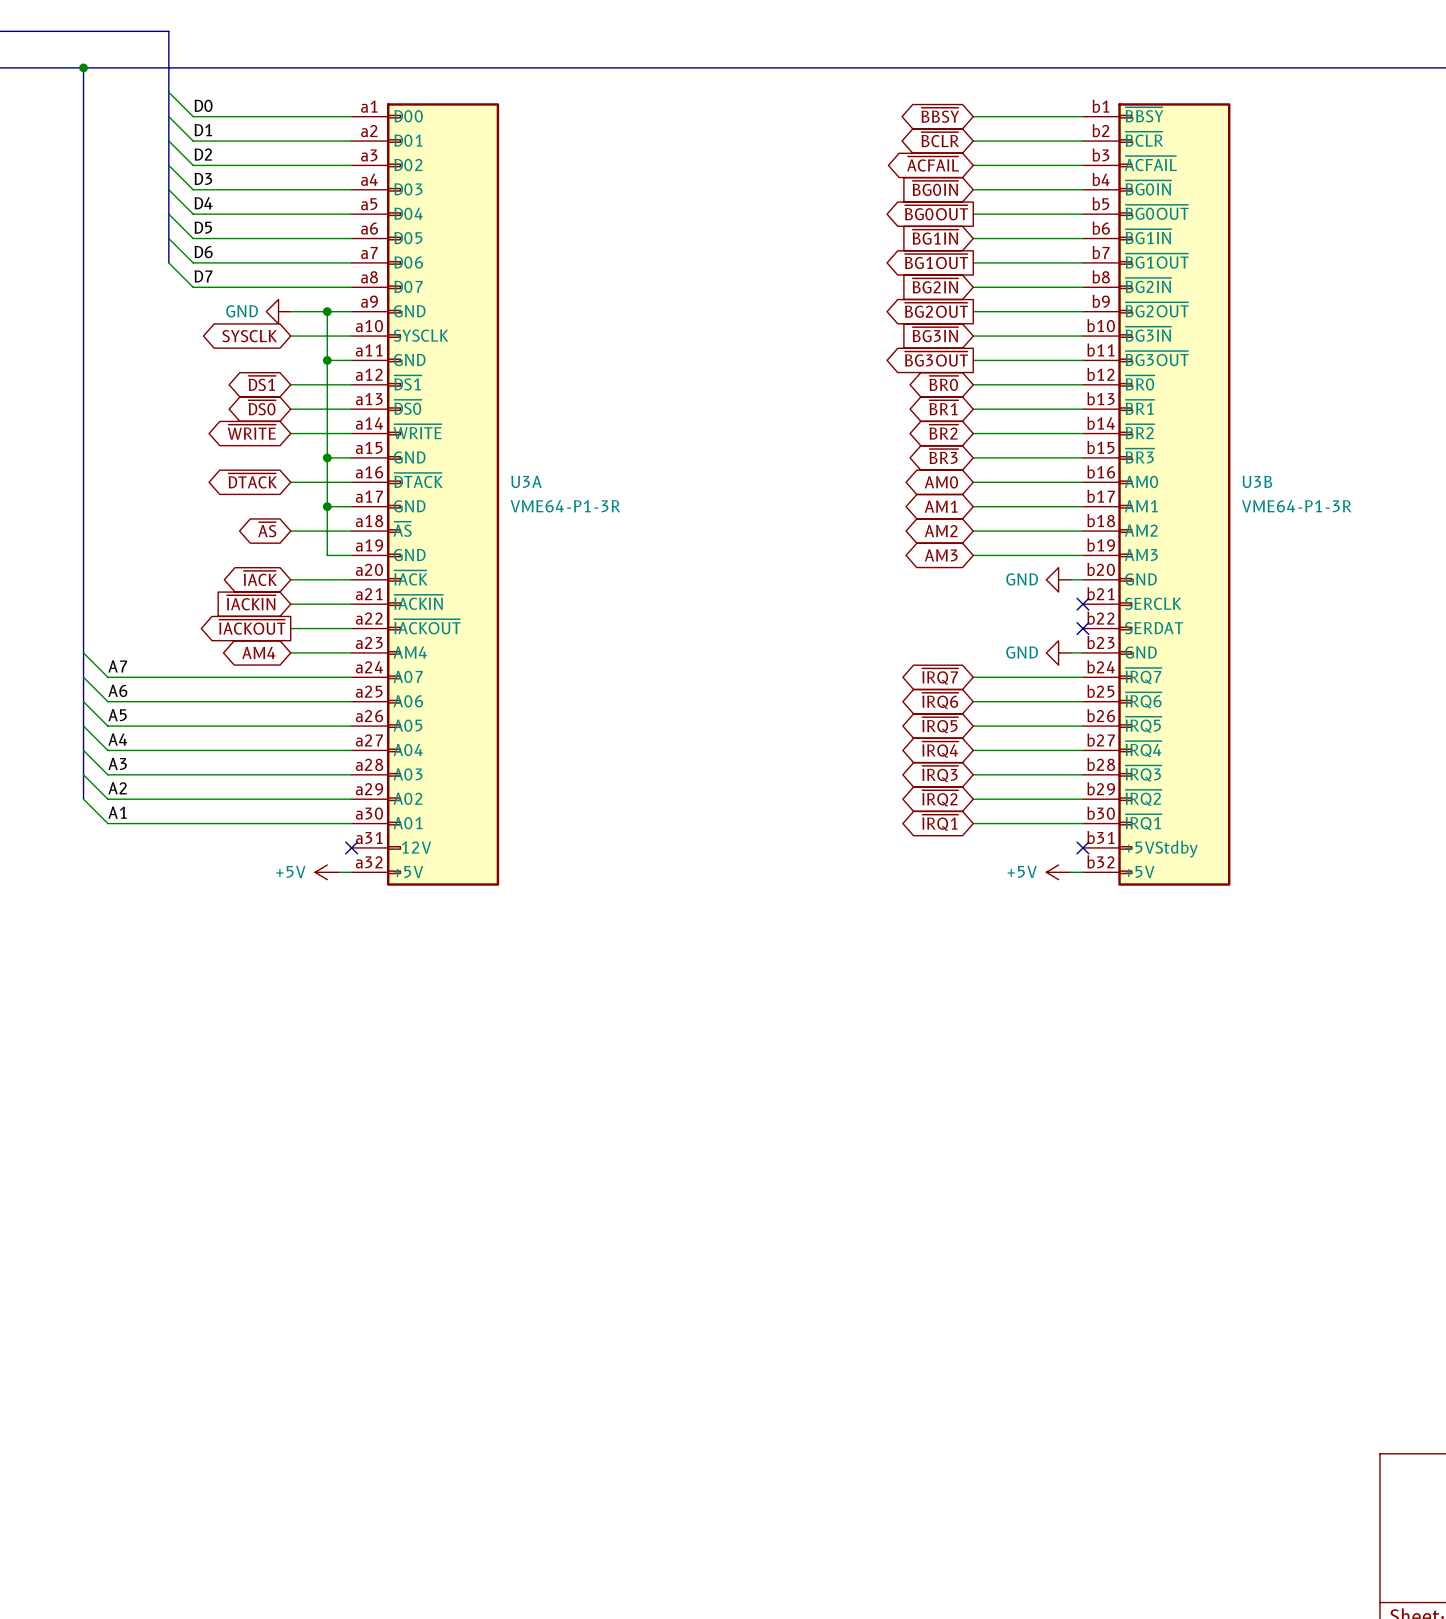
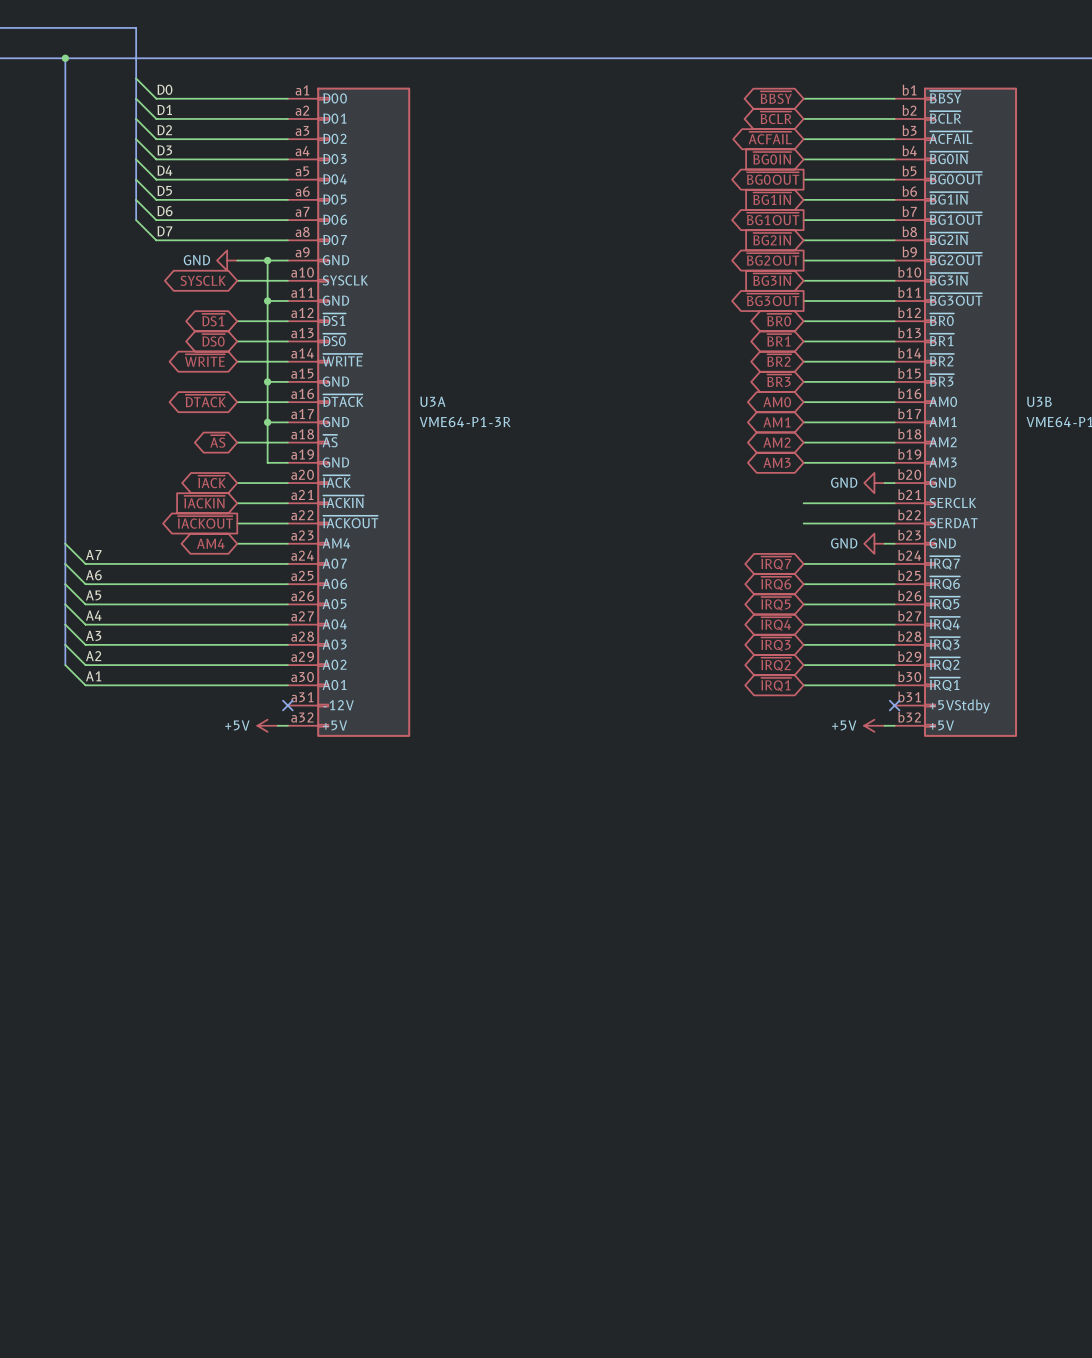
wire: none -> (803, 503) (894, 503)
no-connect mark: (1082, 604) -> none
wire: none -> (803, 523) (894, 523)
no-connect mark: (1082, 628) -> none

